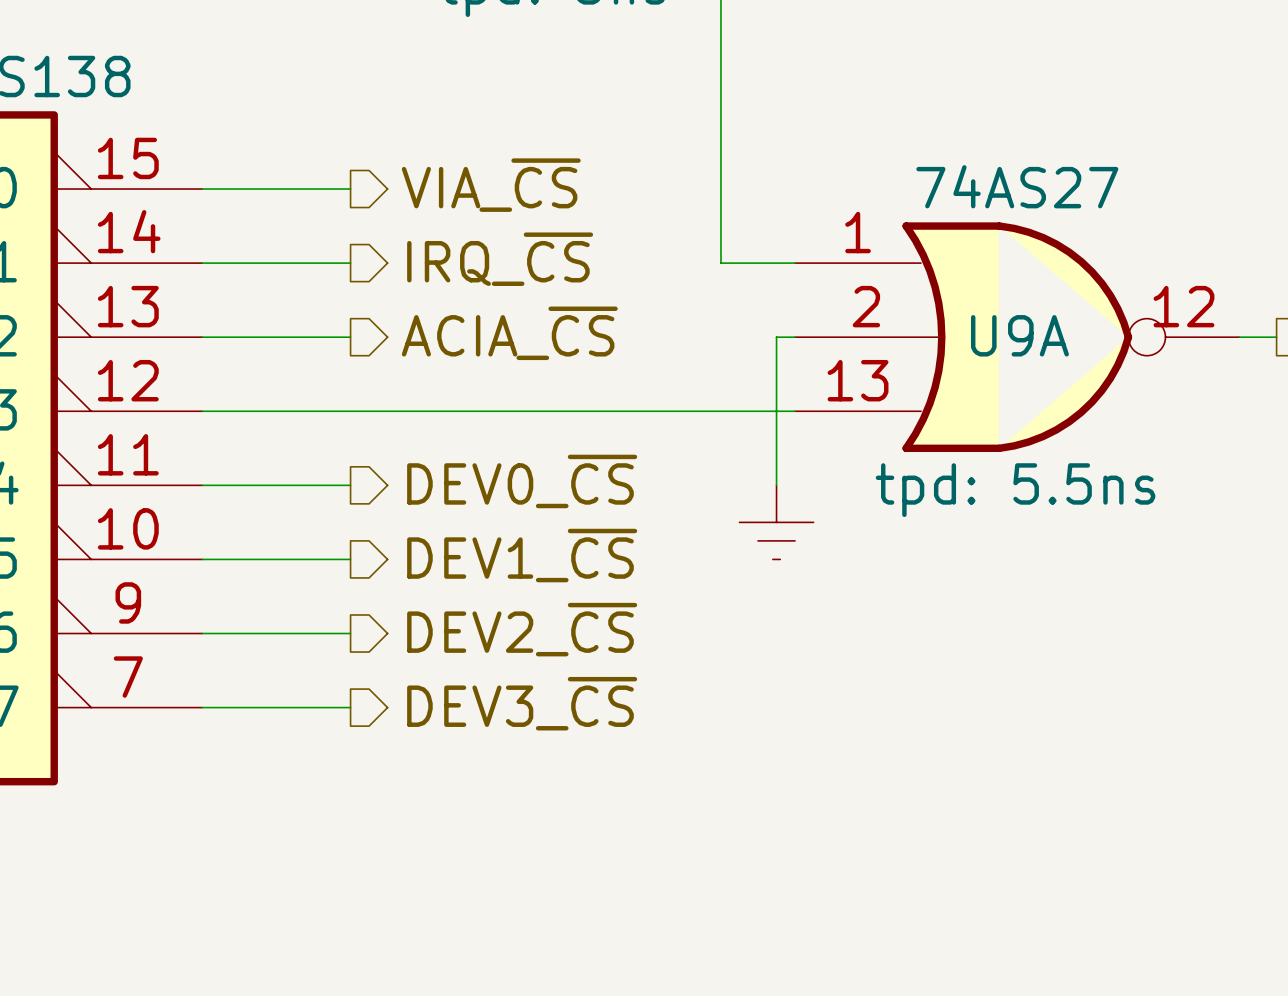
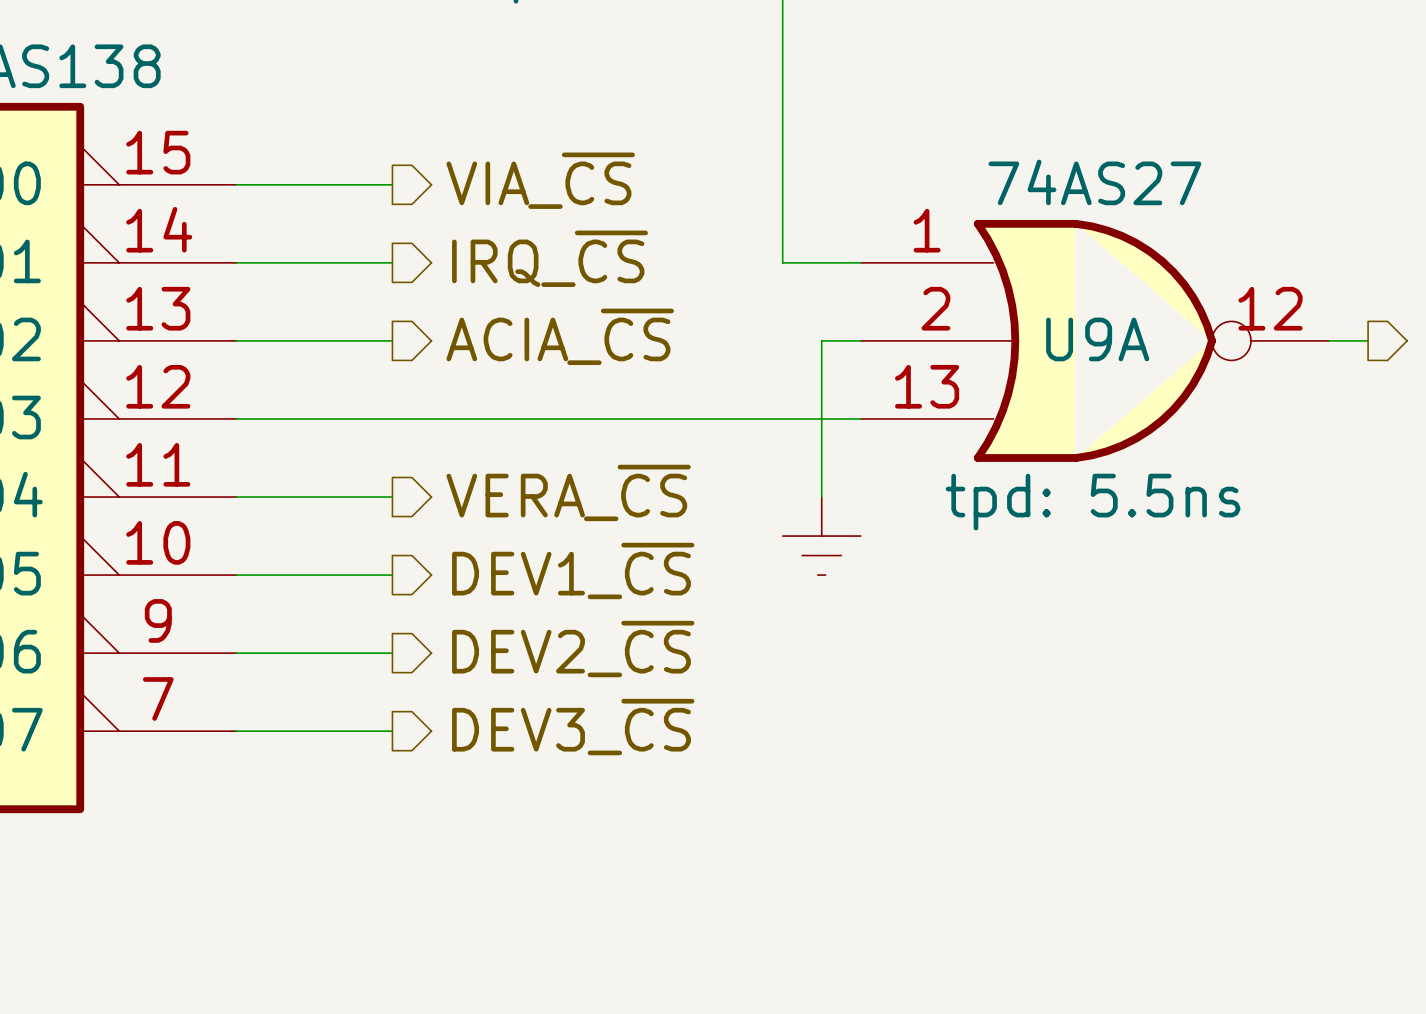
wire: (776, 337) (776, 485) -> (841, 340) (821, 340) (821, 497)
hierarchical label: DEV0_~{CS} (522, 481) -> VERA_~{CS} (568, 492)
power symbol position: (776, 522) -> (821, 536)

